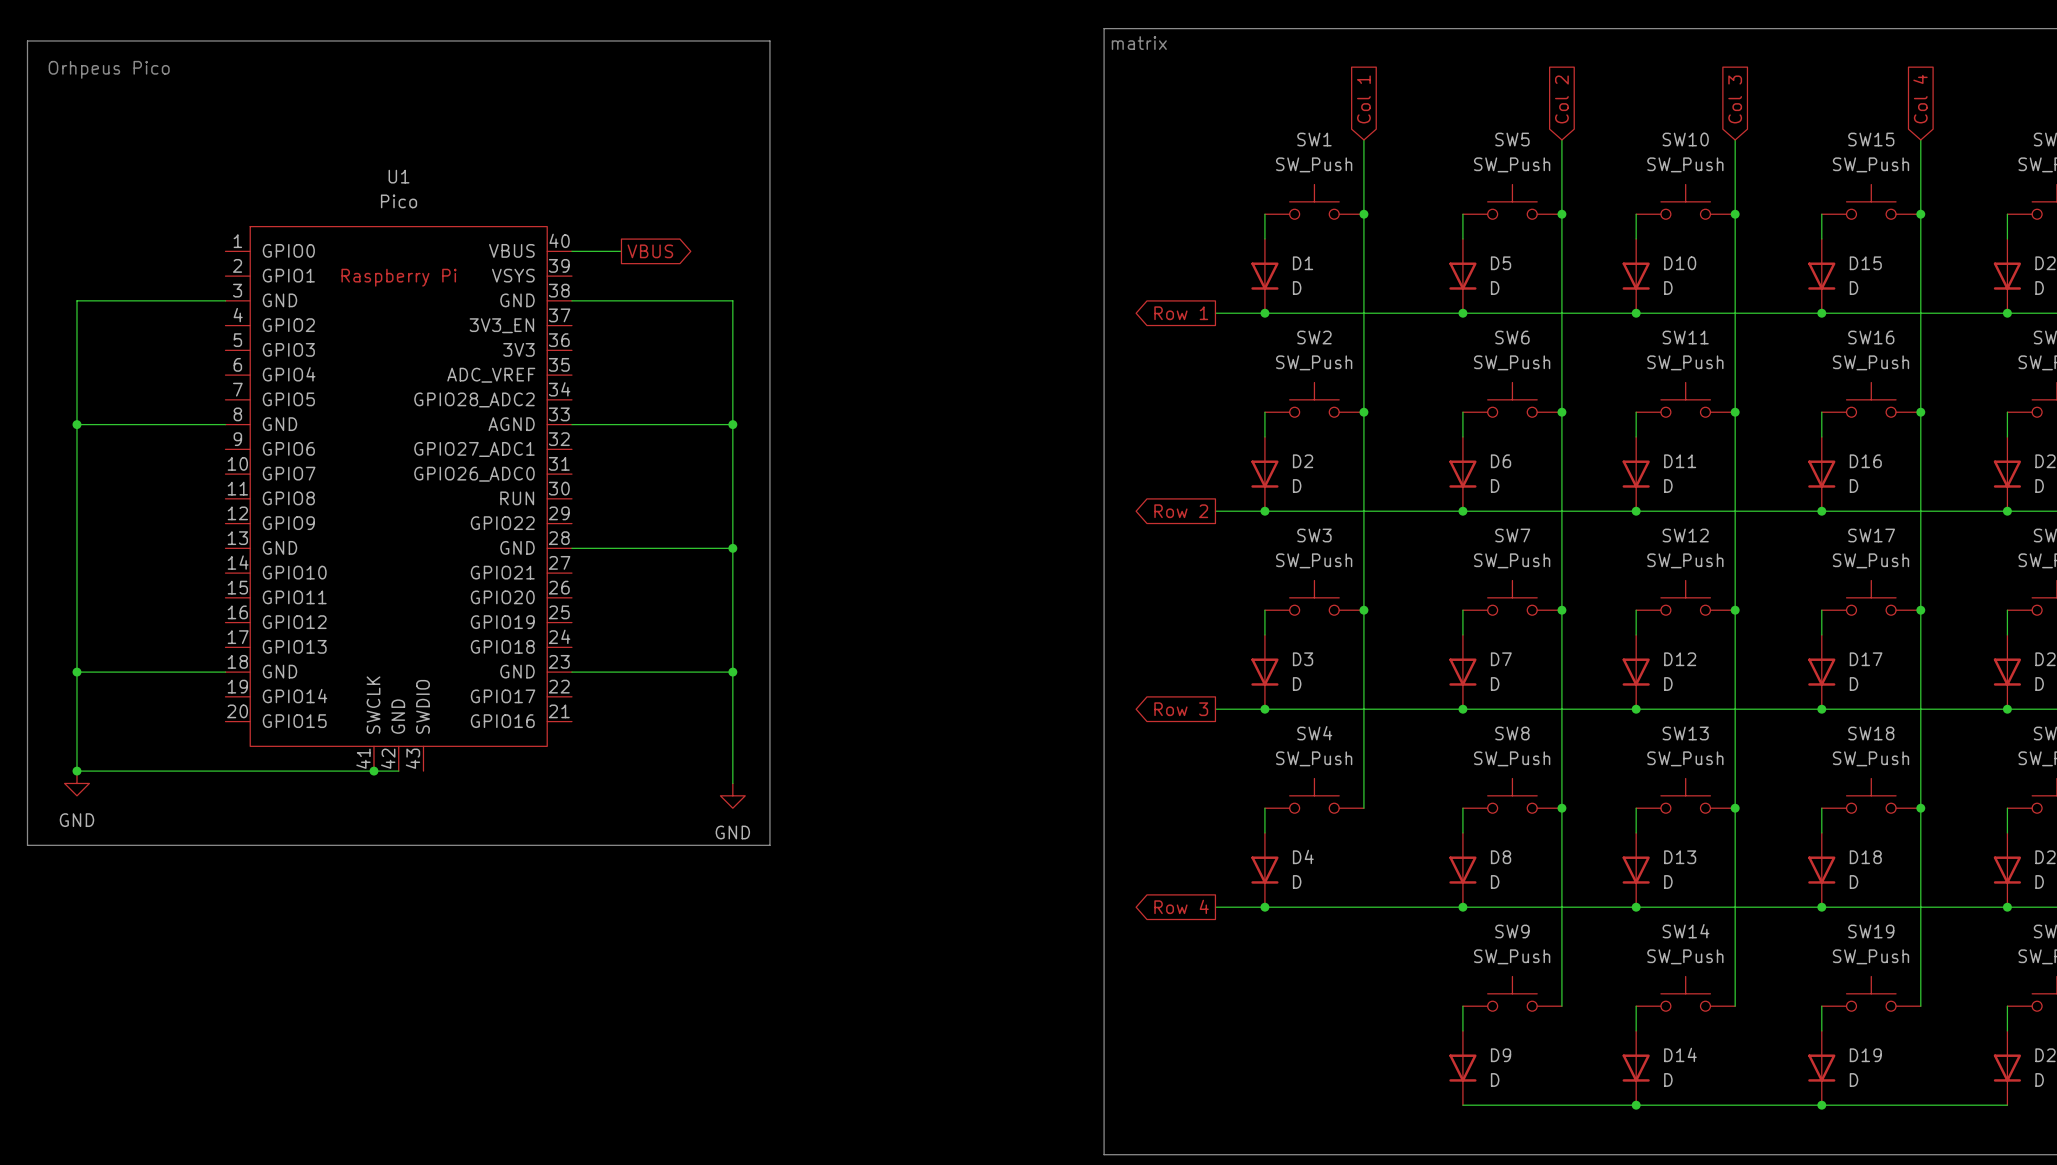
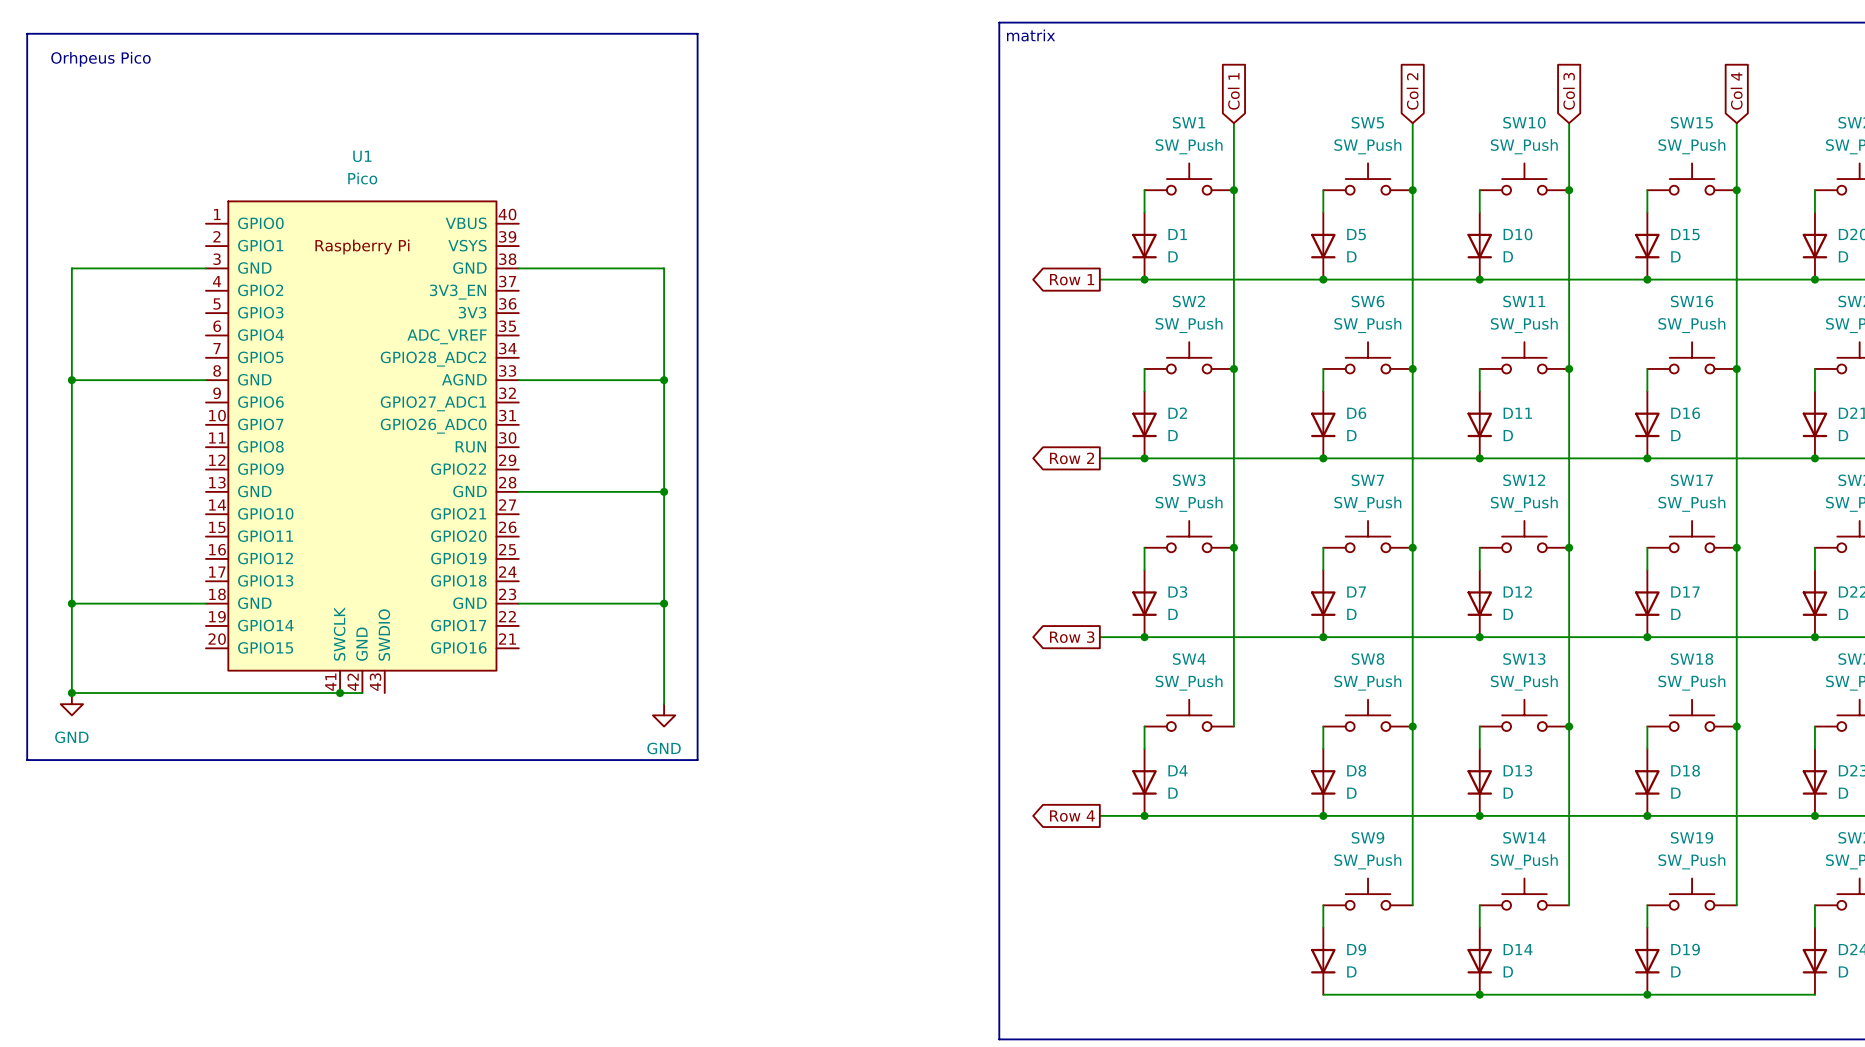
wire: (571, 251) (621, 251) -> none
global label: VBUS (650, 251) -> none

